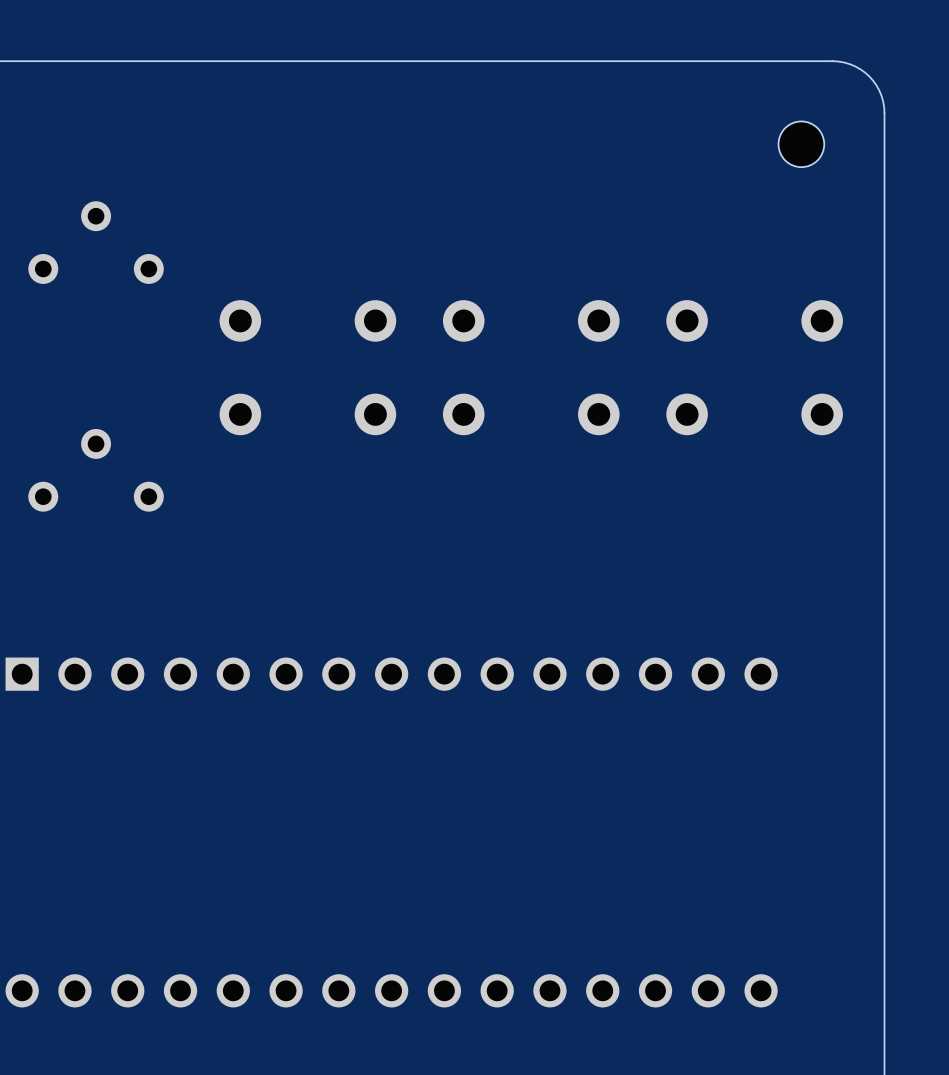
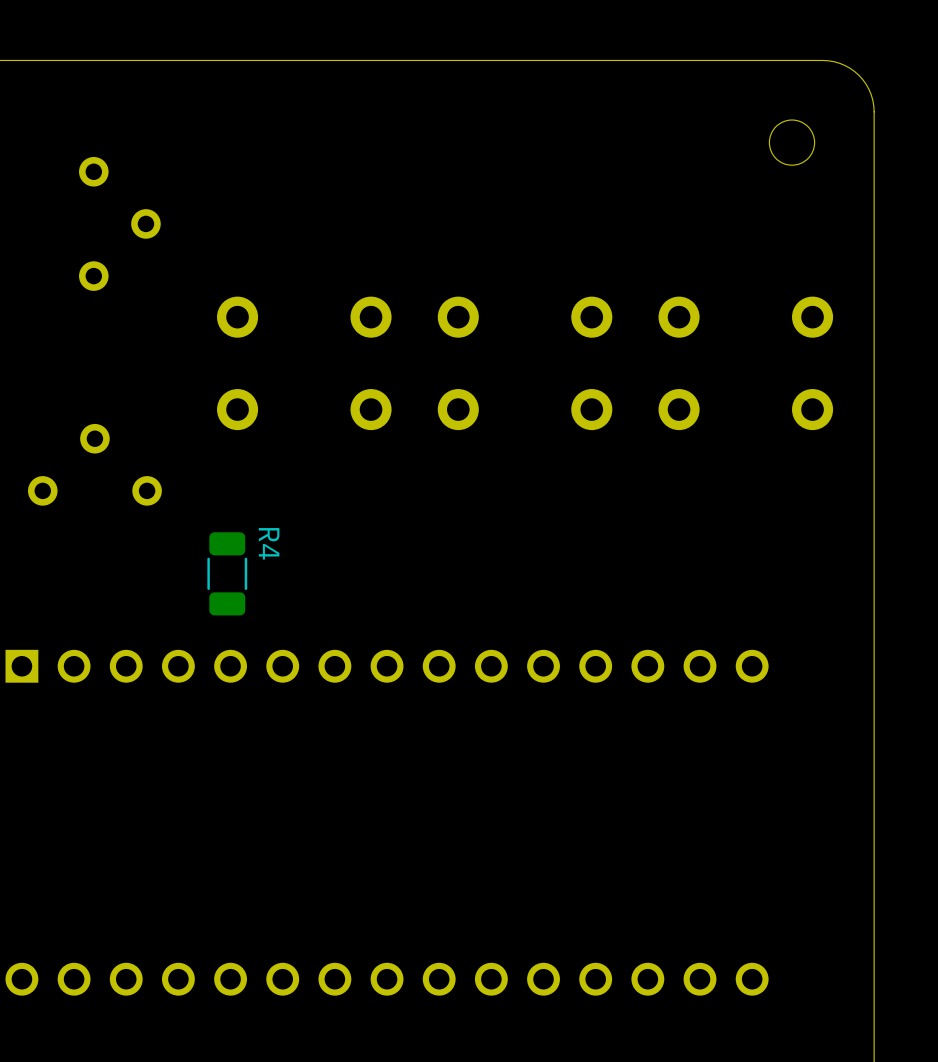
part rotation: 0° (96, 242) -> 90° clockwise (119, 223)
R4: none -> (227, 573)

